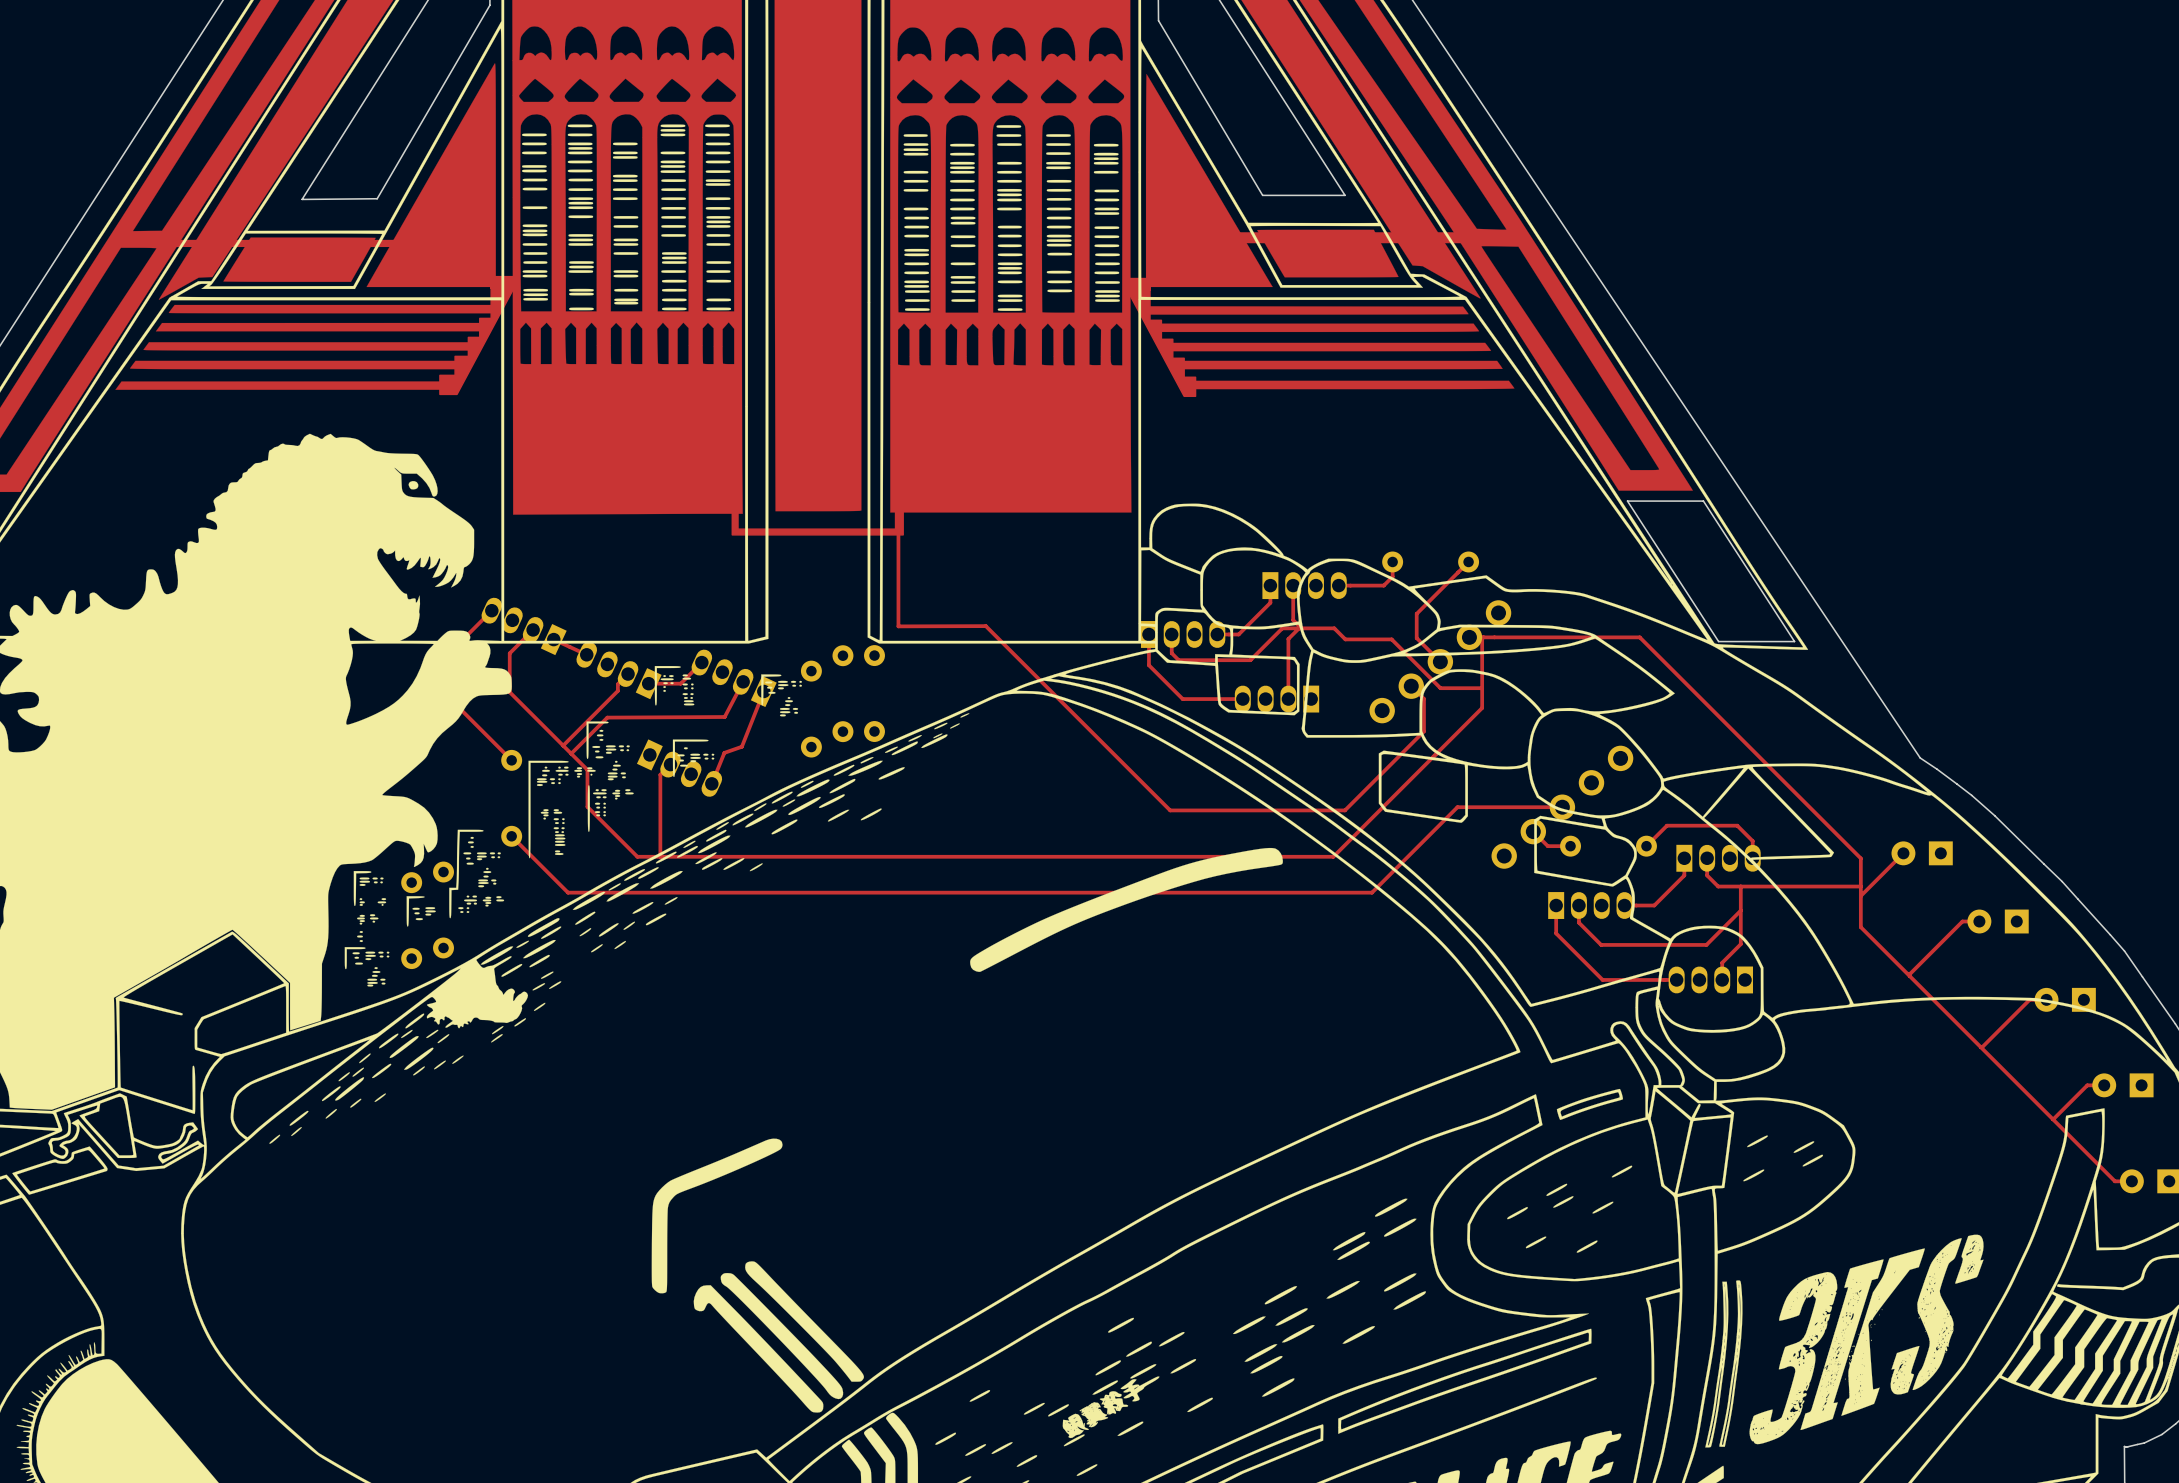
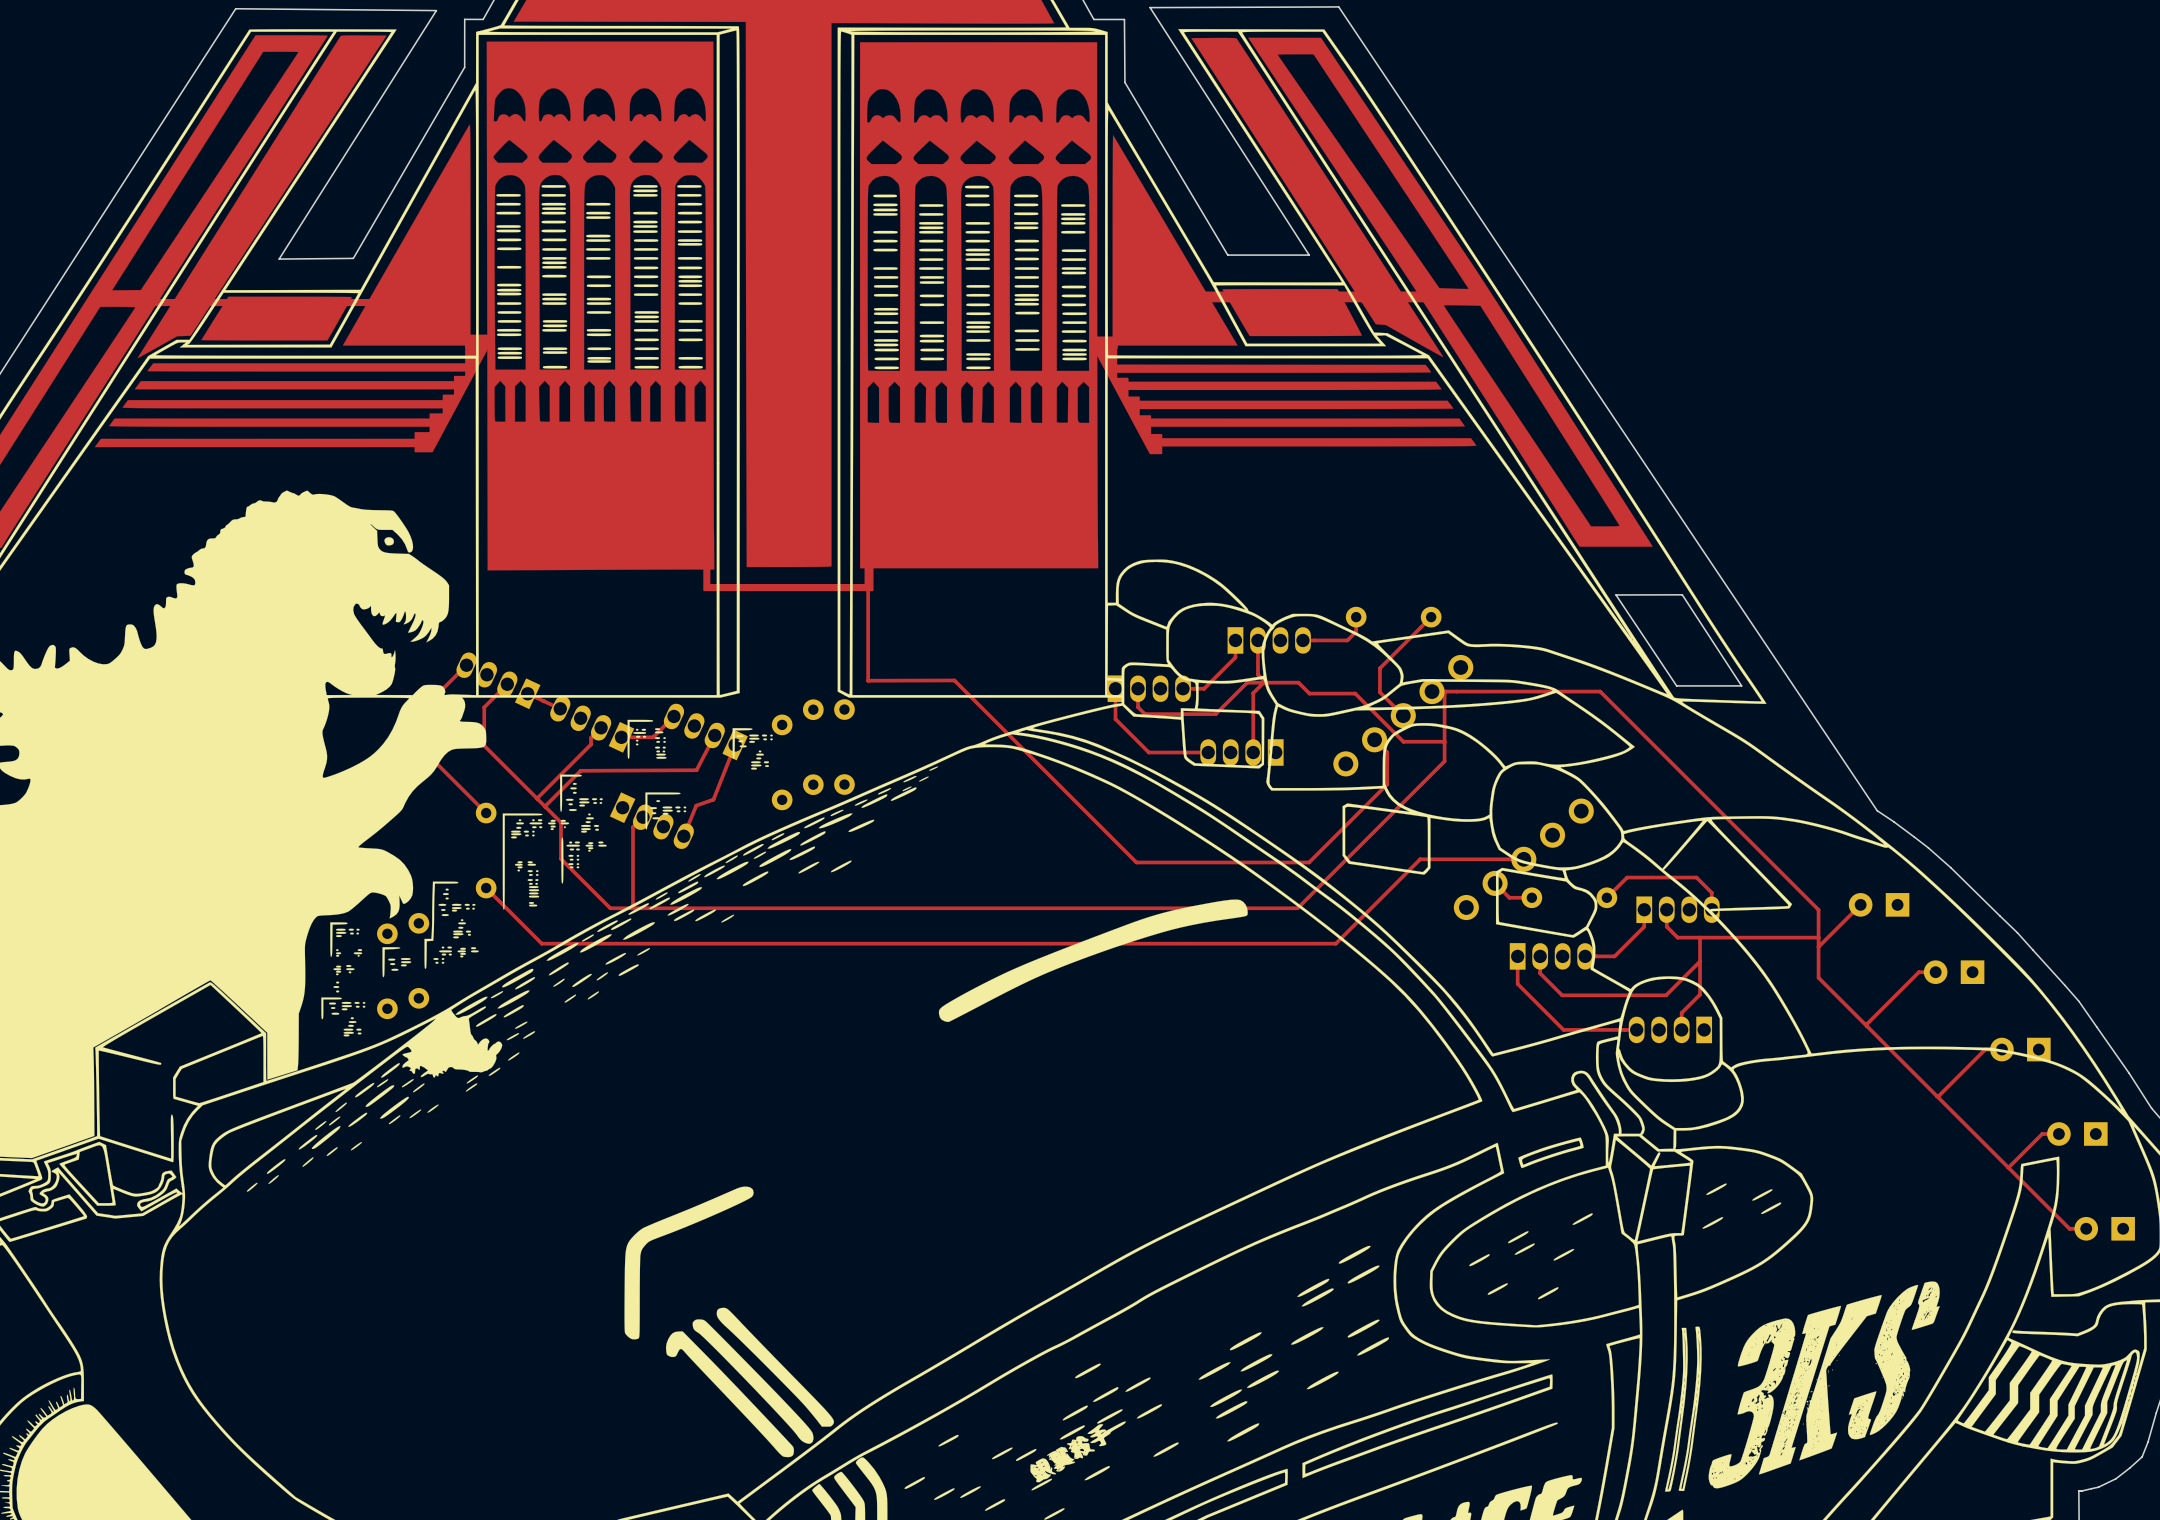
board edge: (1627, 501) (1703, 501) (1794, 641) (1718, 641) (1627, 501) -> (1682, 594) (1616, 594) (1676, 685) (1741, 685) (1682, 594)

